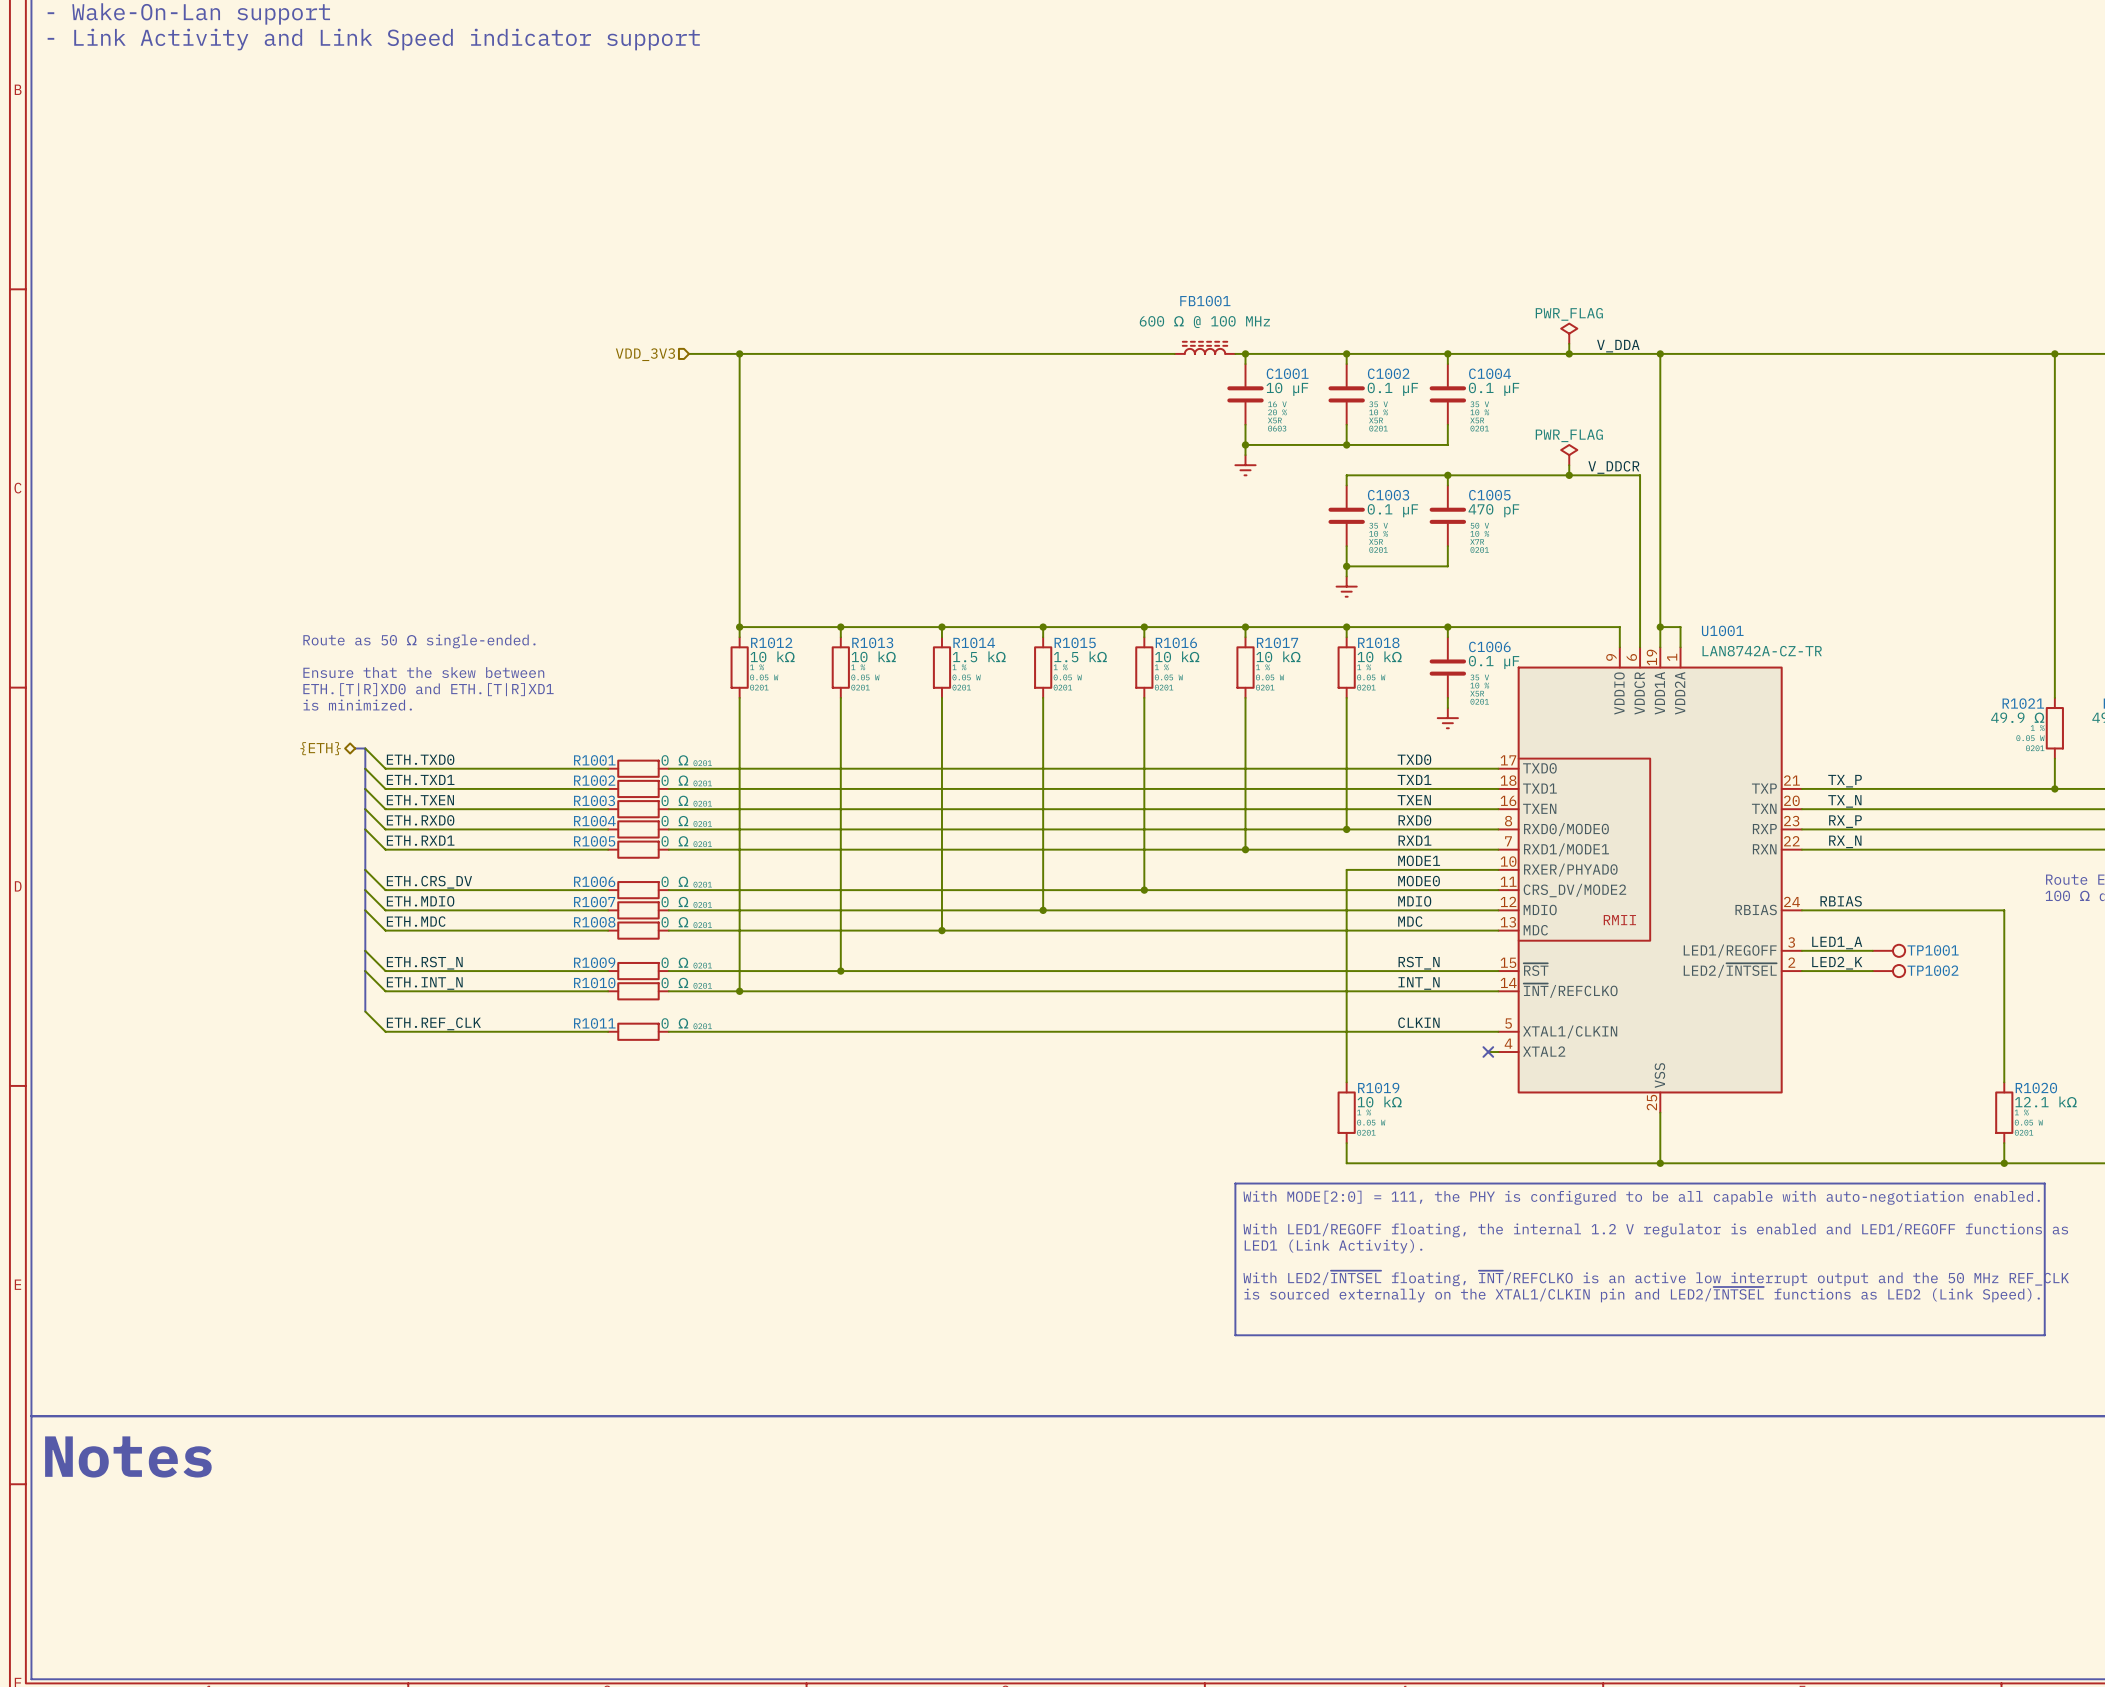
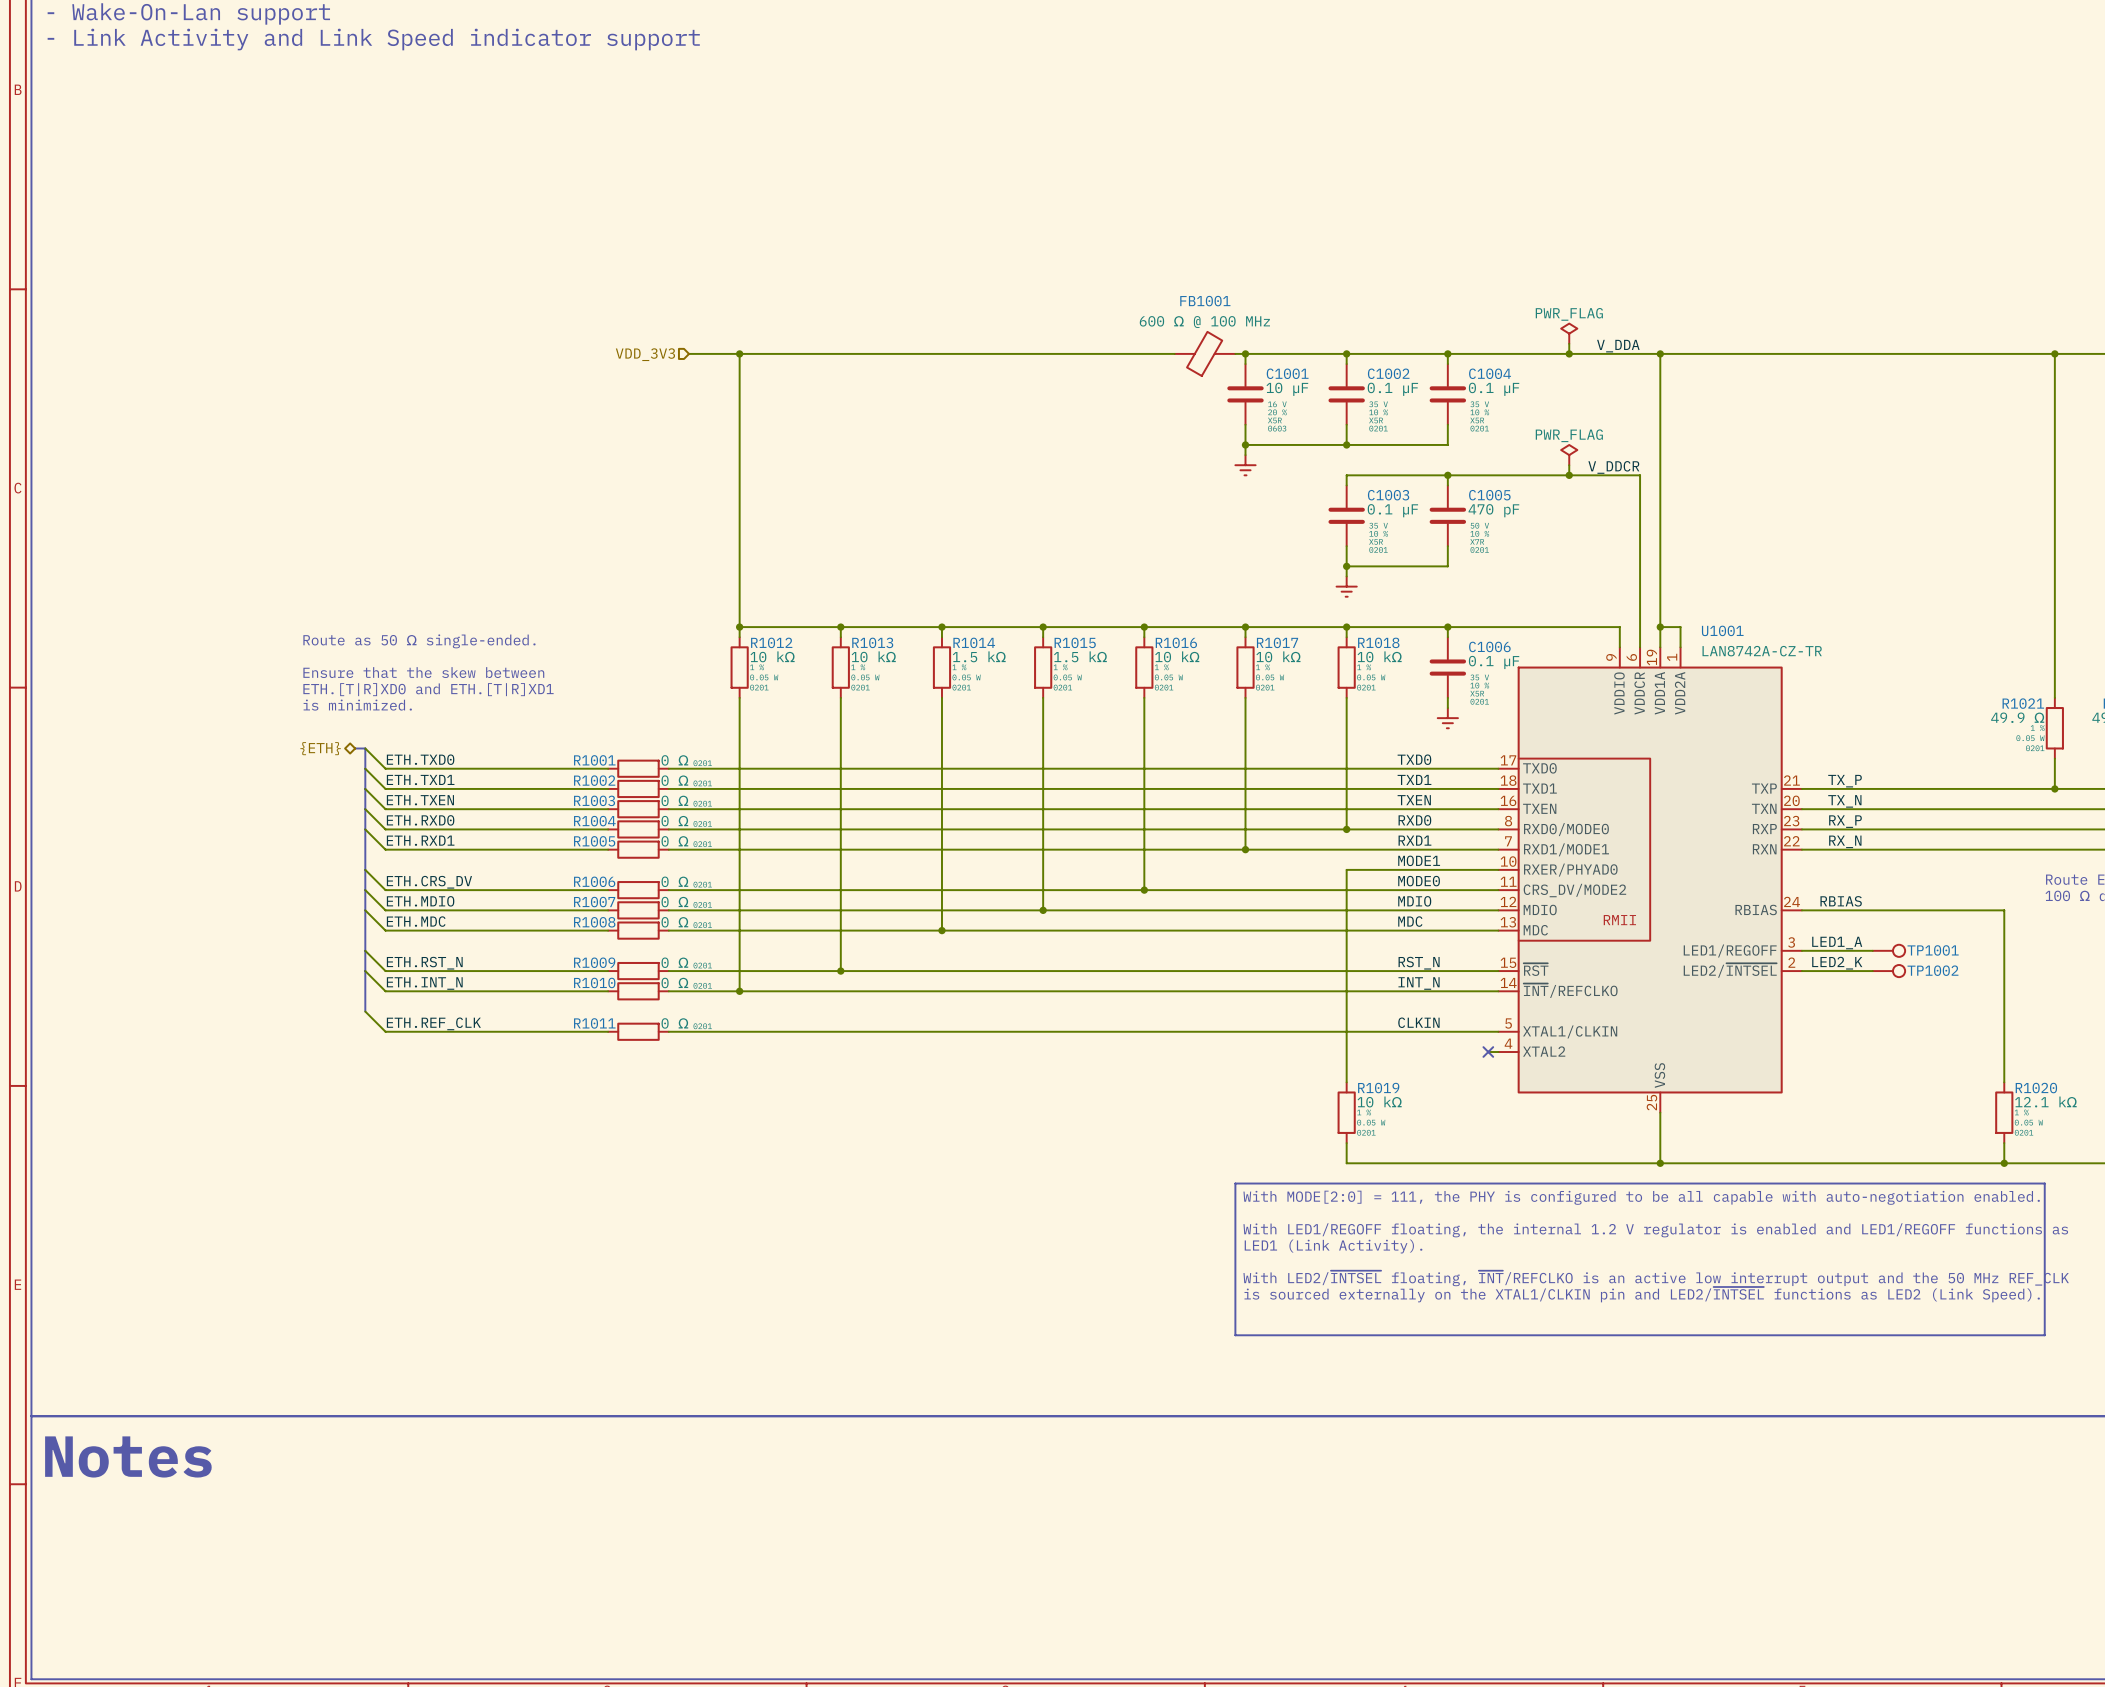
FB1001 symbol: [1174, 341, 1236, 354] -> [1174, 331, 1236, 376]

